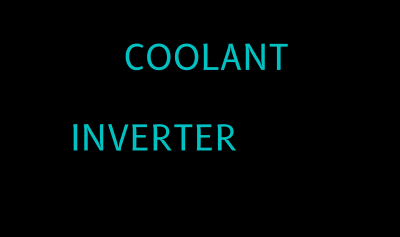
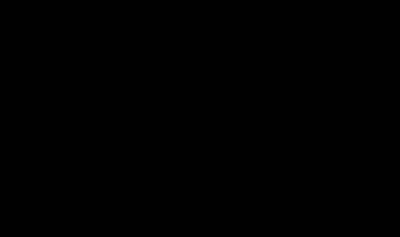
text: COOLANT (206, 56) -> none
text: INVERTER (154, 137) -> none

